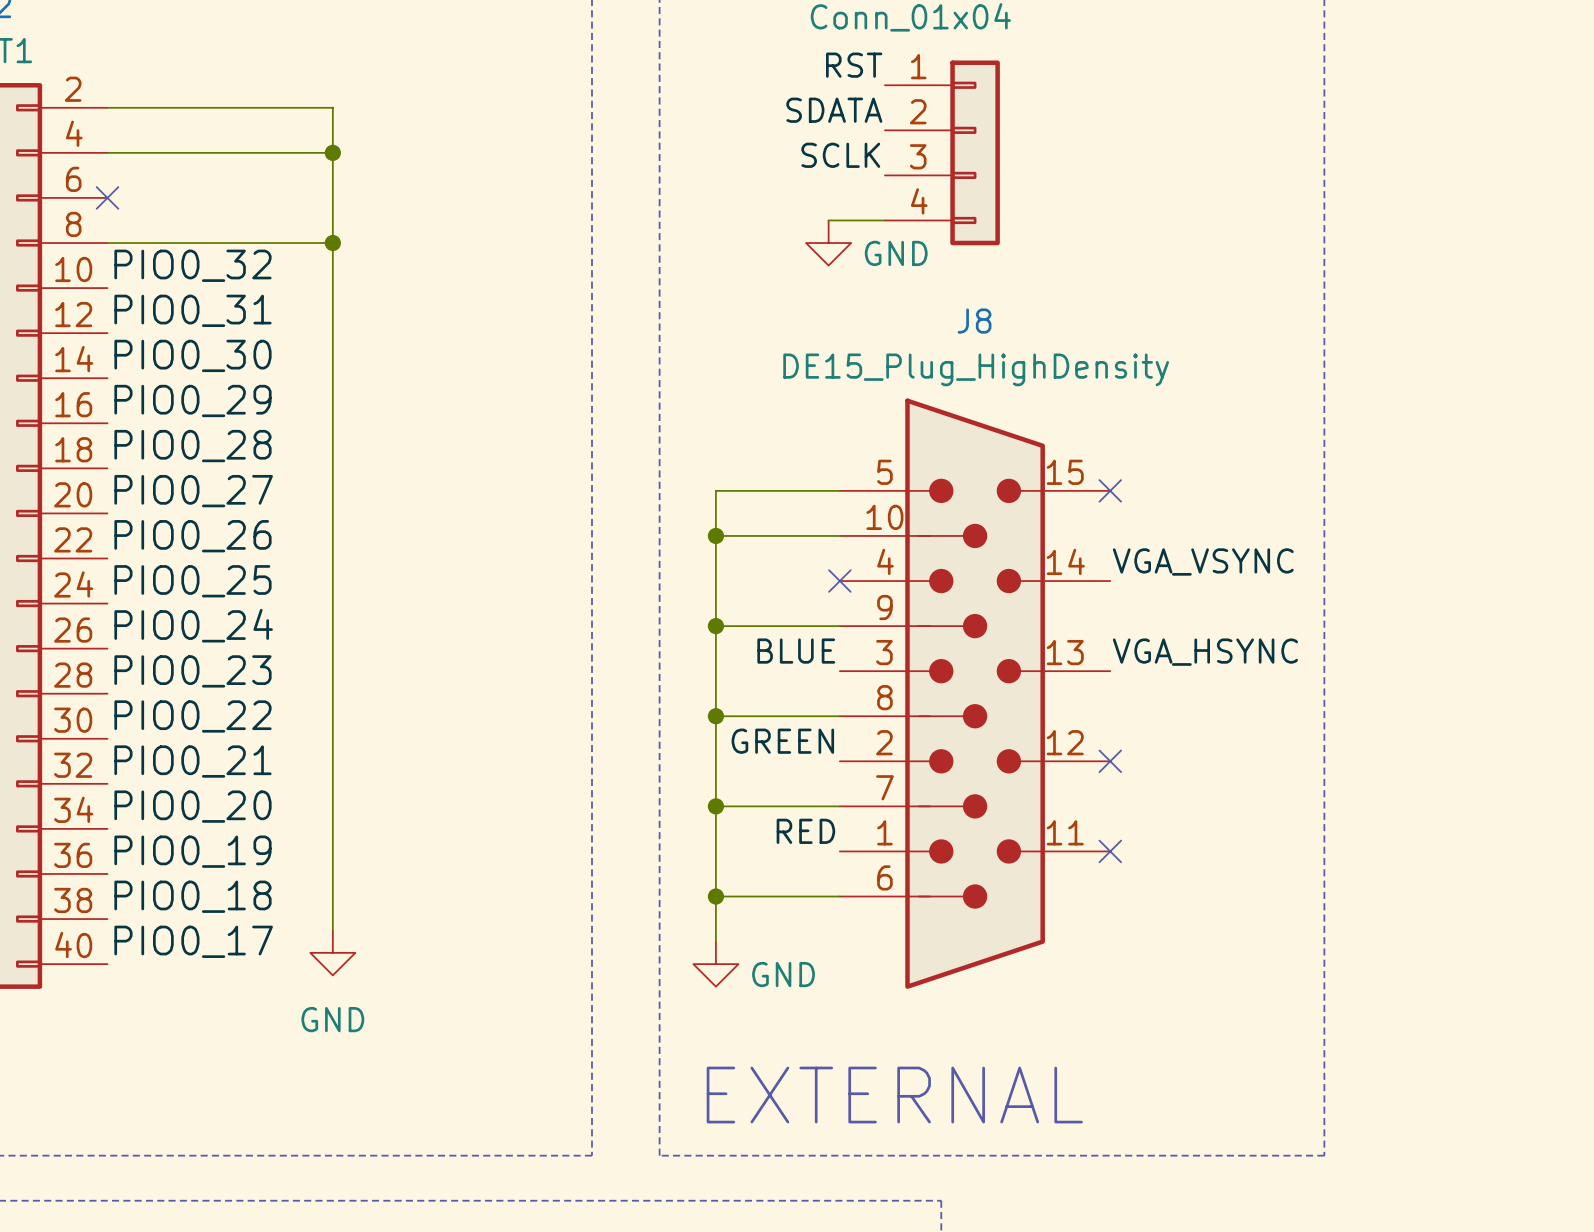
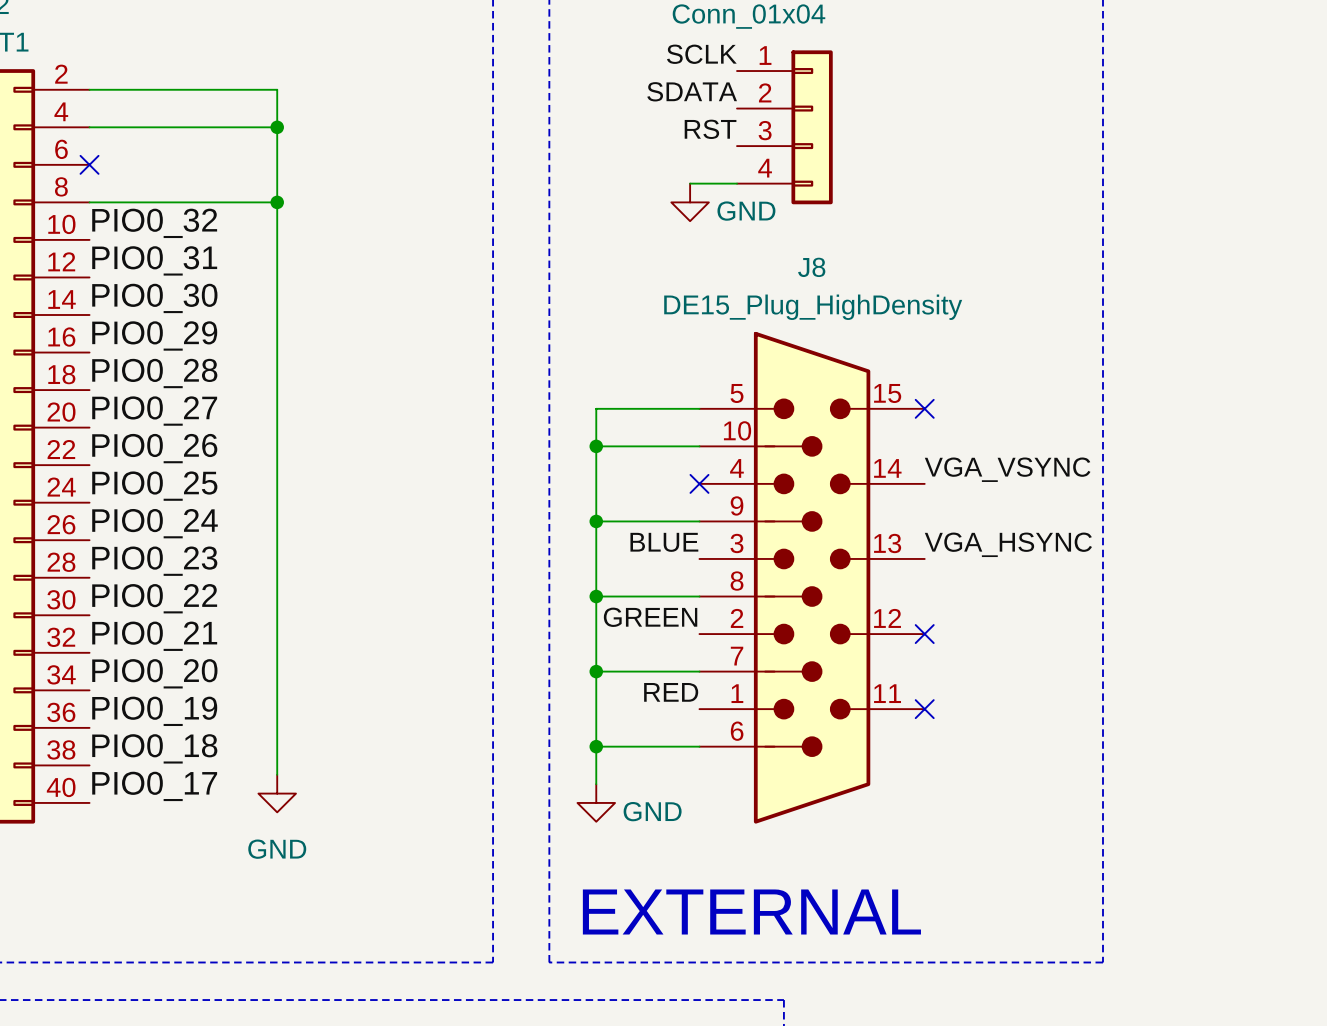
label: RST (854, 65) -> SCLK (701, 54)
label: SCLK (840, 155) -> RST (710, 129)

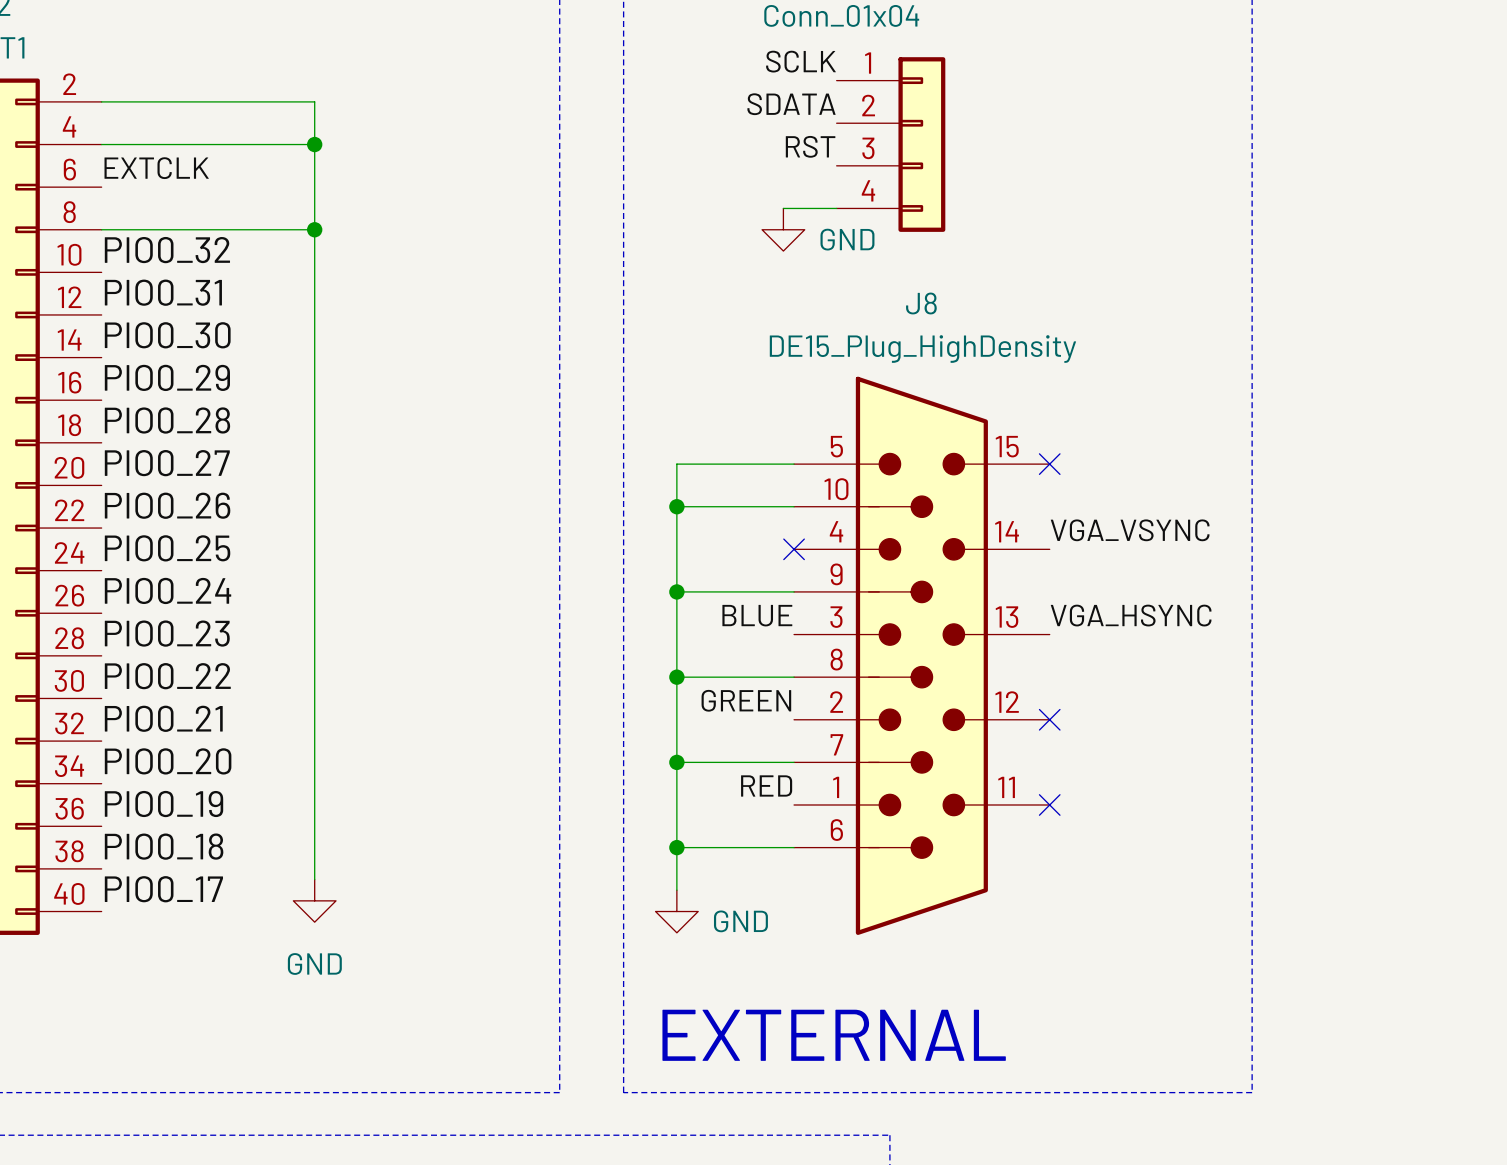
label: none -> EXTCLK (156, 168)
no-connect mark: (89, 164) -> none

